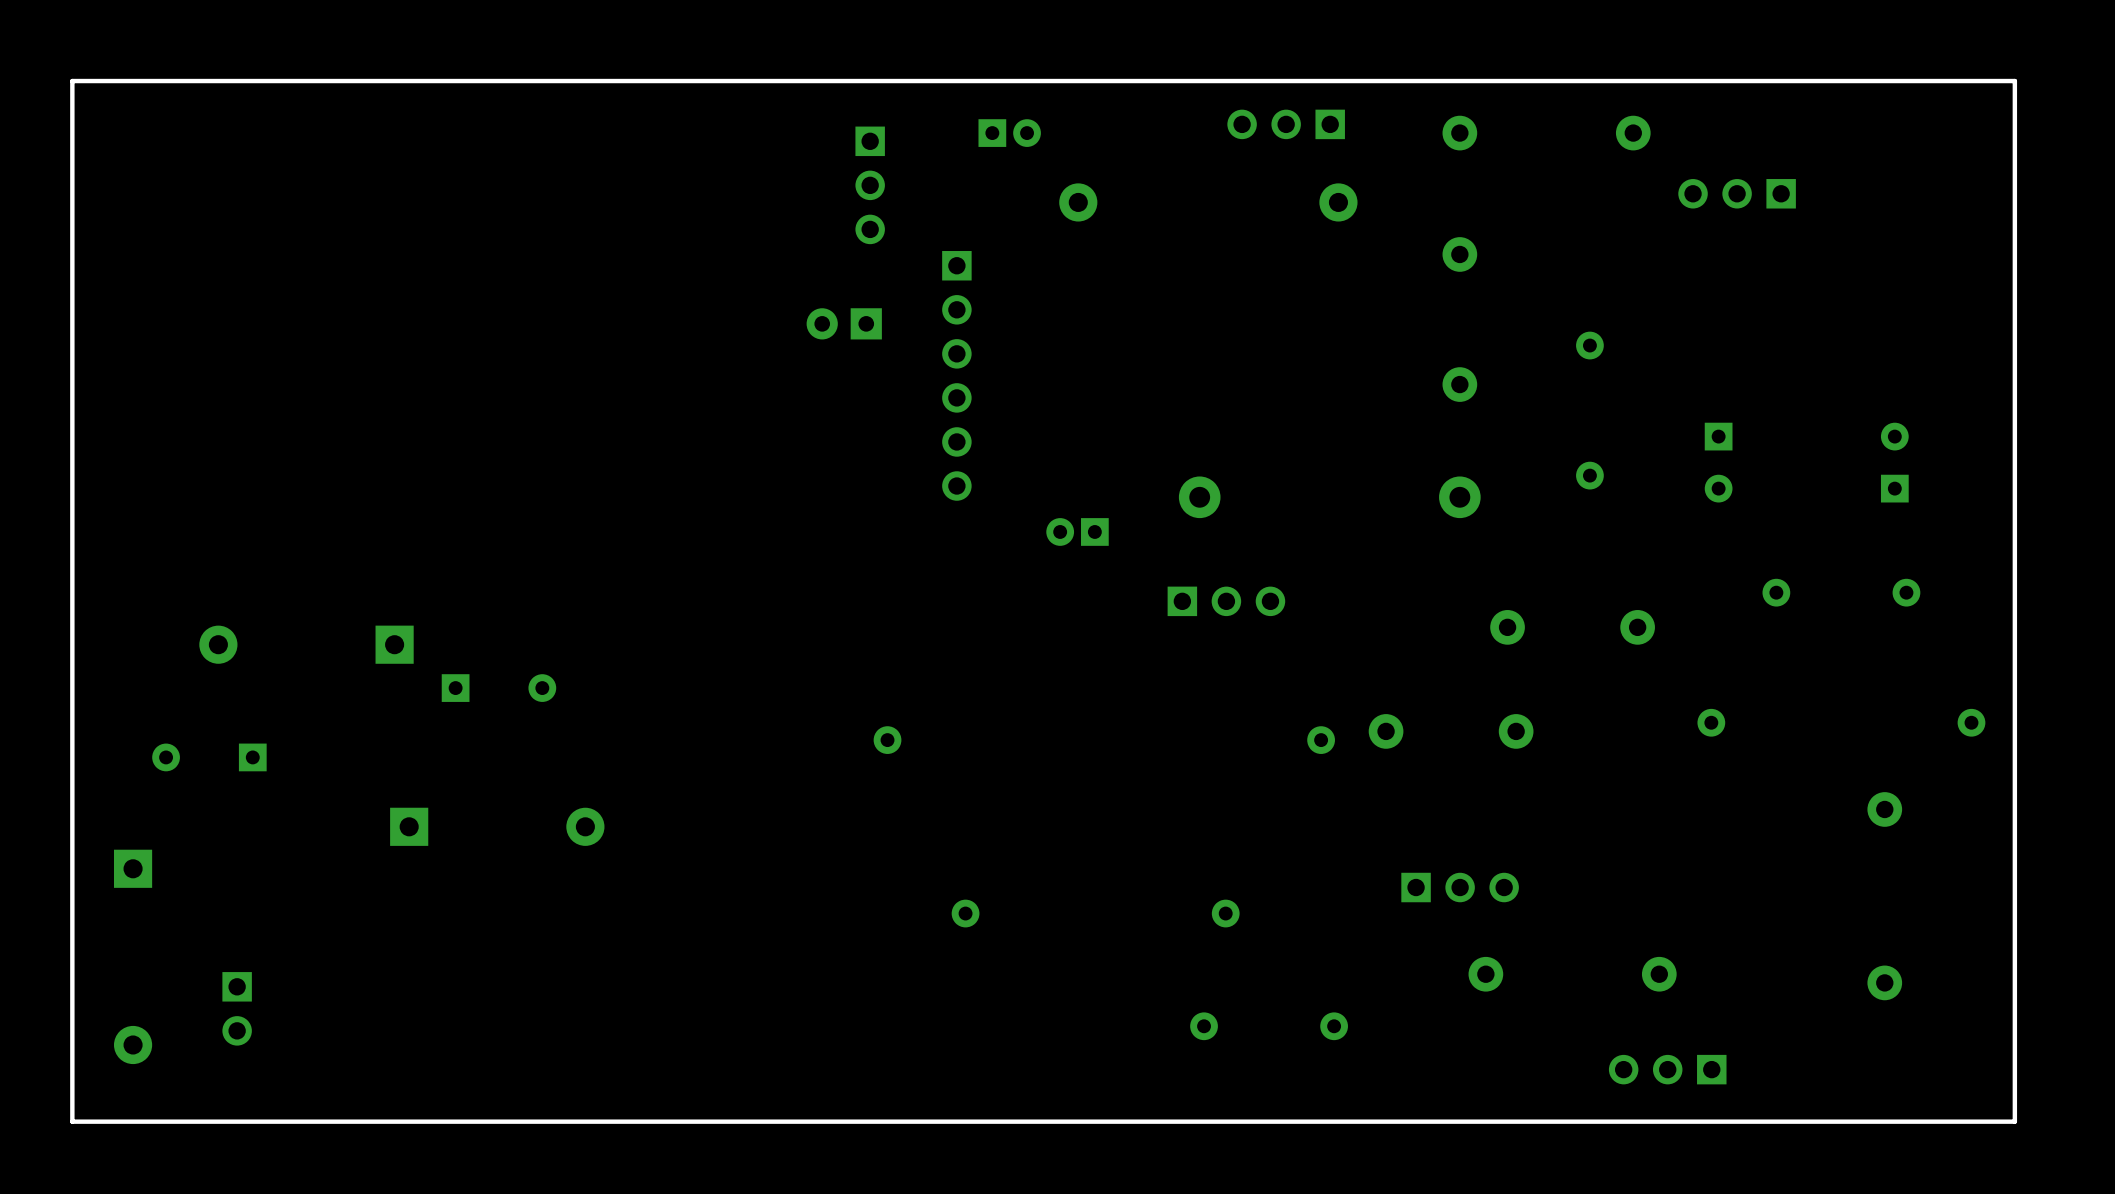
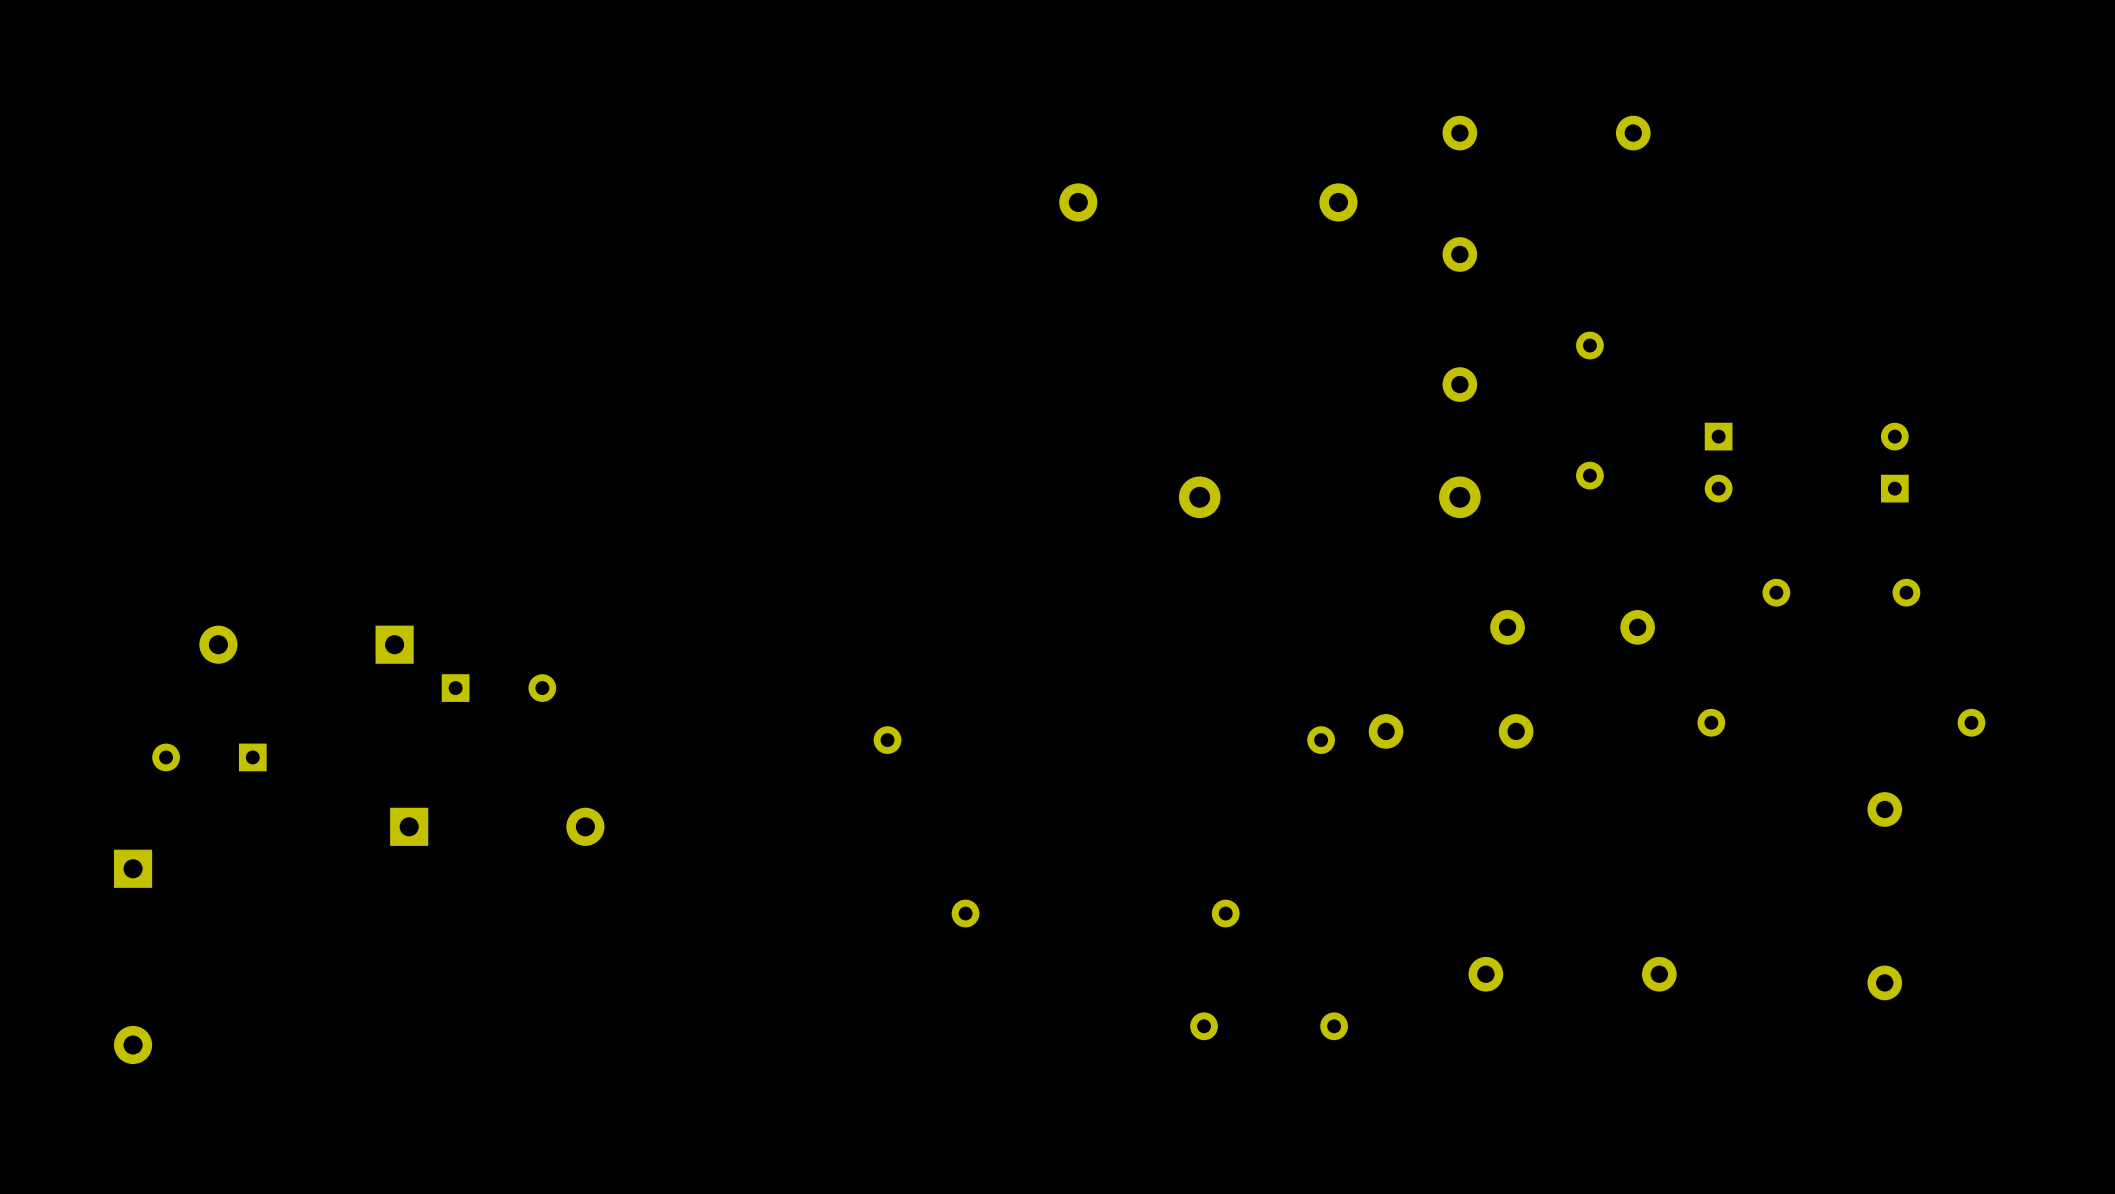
board edge: (2014, 81) (72, 81) (72, 1121) (2014, 1121) (2014, 81) -> none
part: (1286, 124) -> none
part: (1009, 133) -> none
part: (870, 185) -> none
part: (1737, 193) -> none
part: (844, 323) -> none
part: (956, 375) -> none
part: (1077, 531) -> none
part: (1226, 601) -> none
part: (1460, 887) -> none
part: (237, 1008) -> none
part: (1667, 1069) -> none

